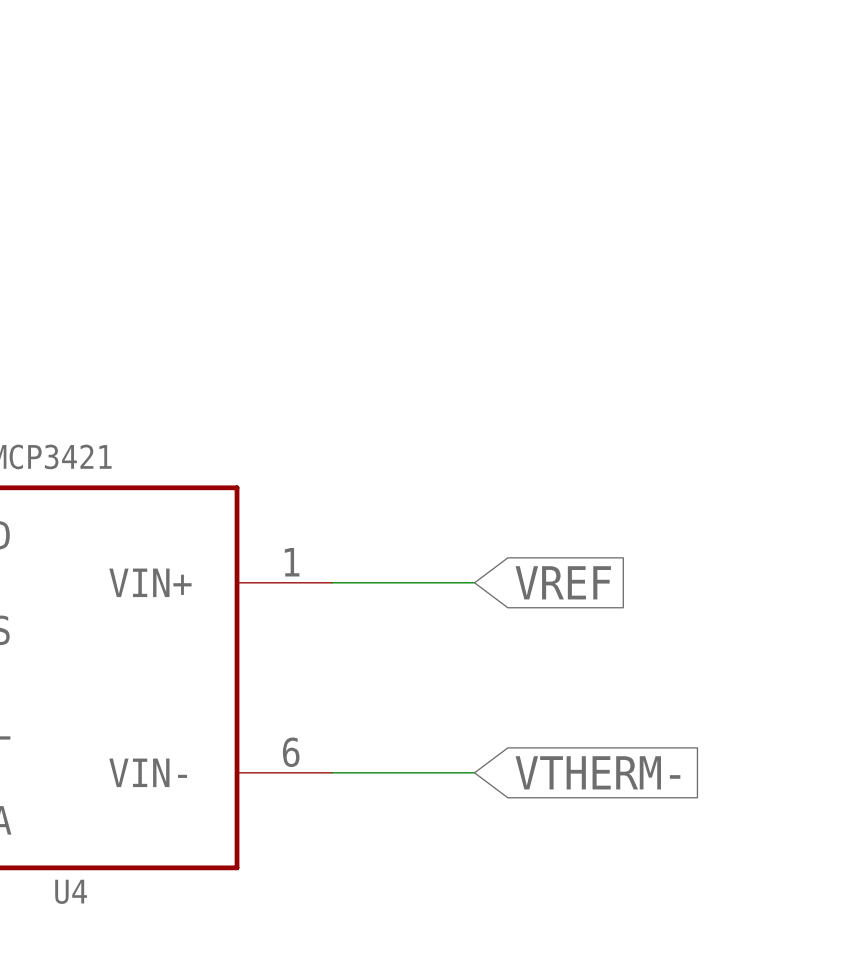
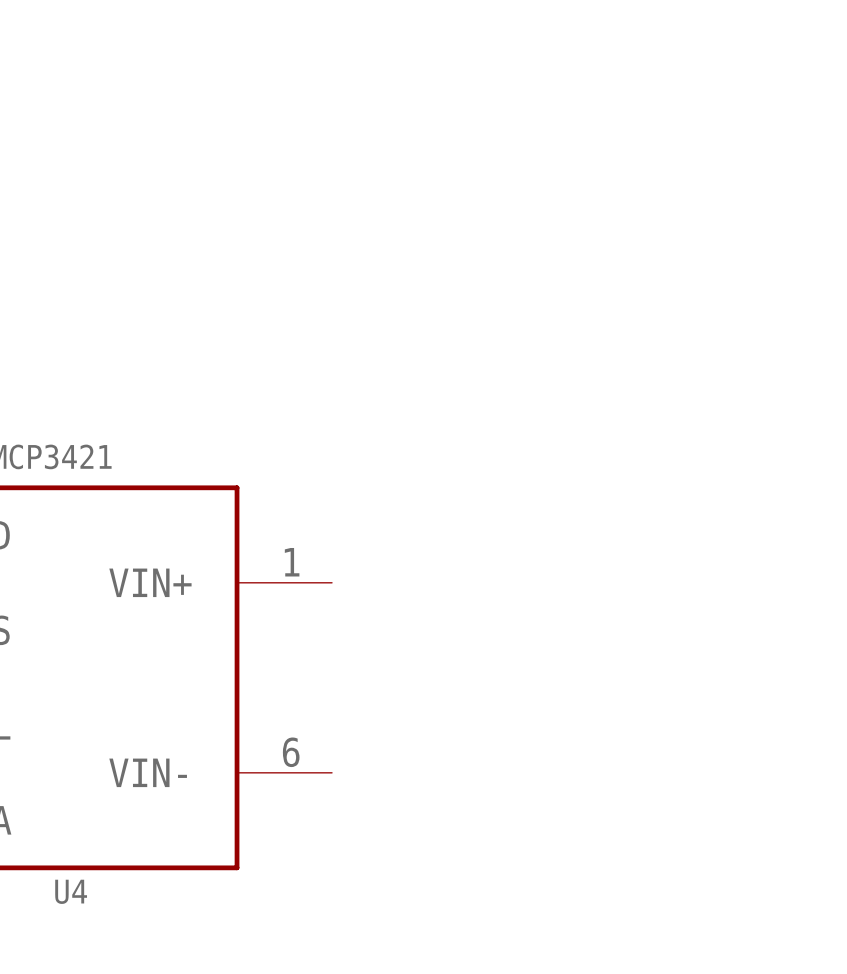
wire: (332, 582) (474, 582) -> none
global label: VREF (563, 582) -> none
wire: (332, 772) (474, 772) -> none
global label: VTHERM- (597, 772) -> none

